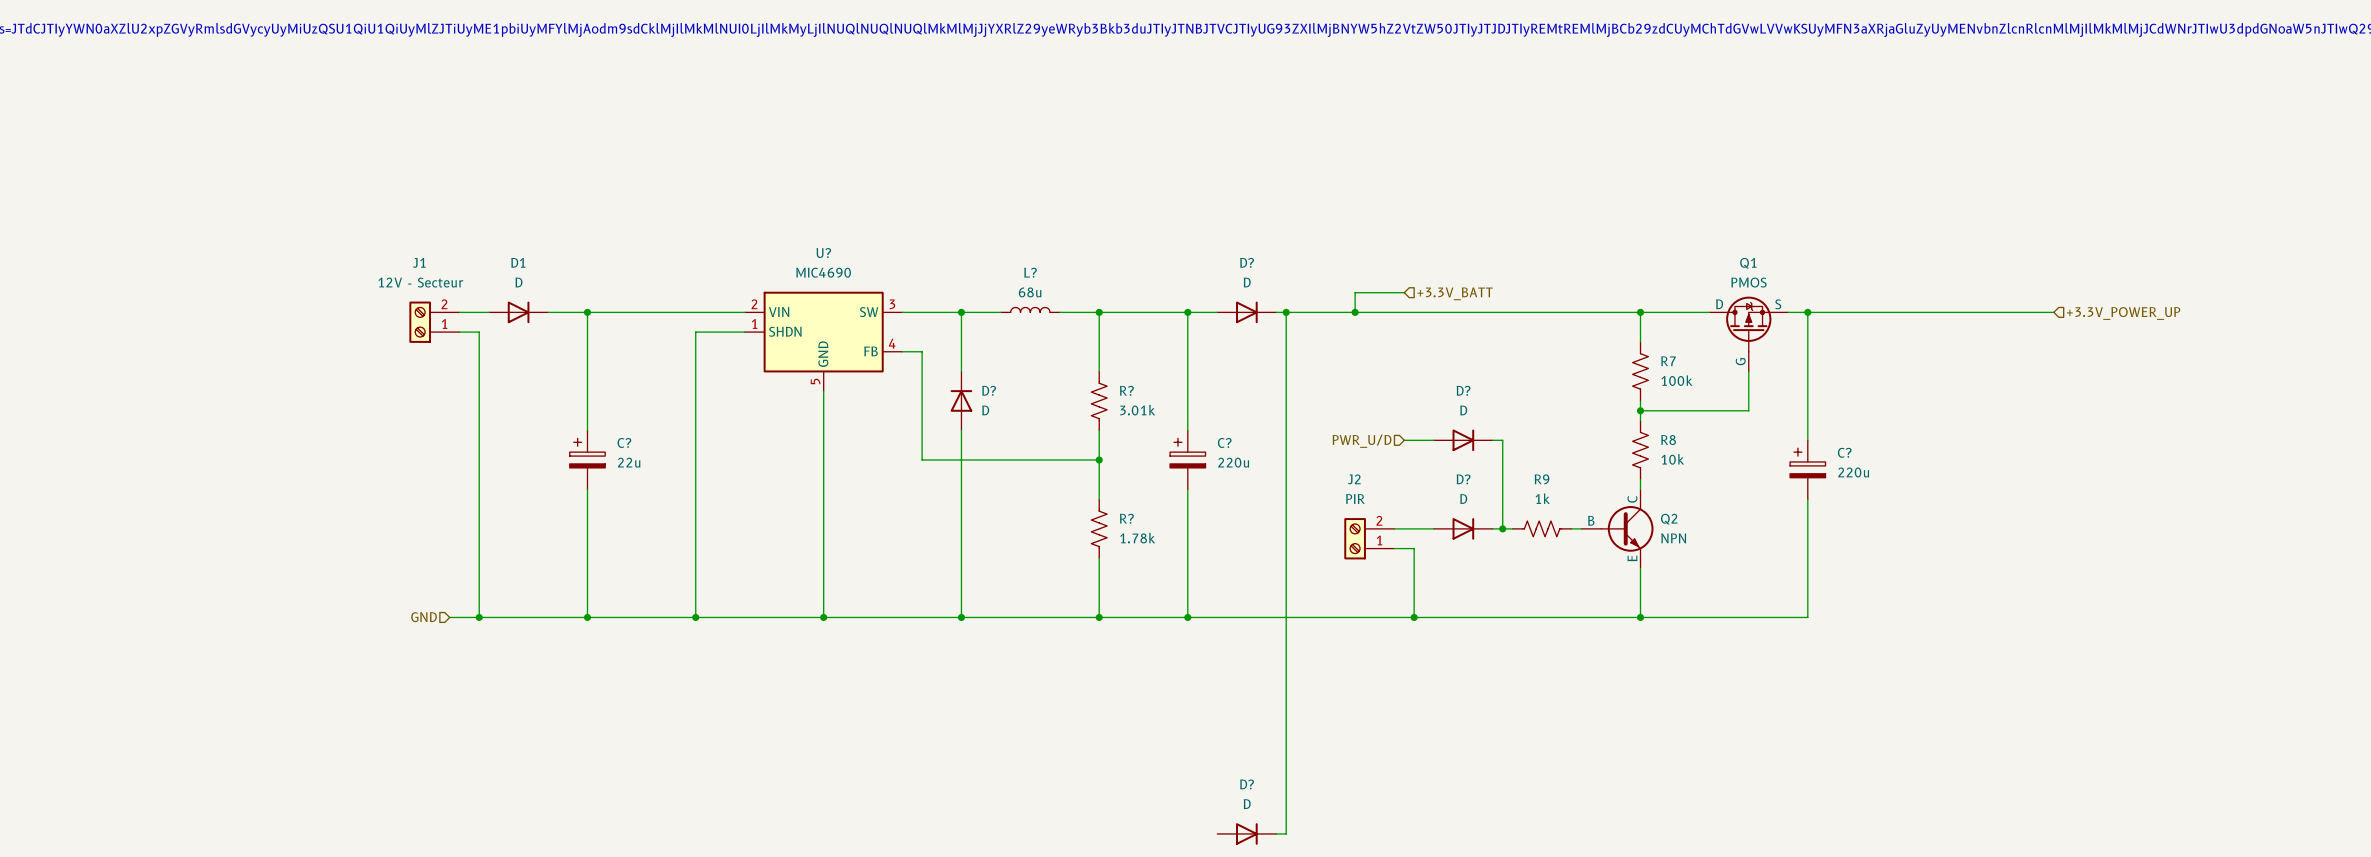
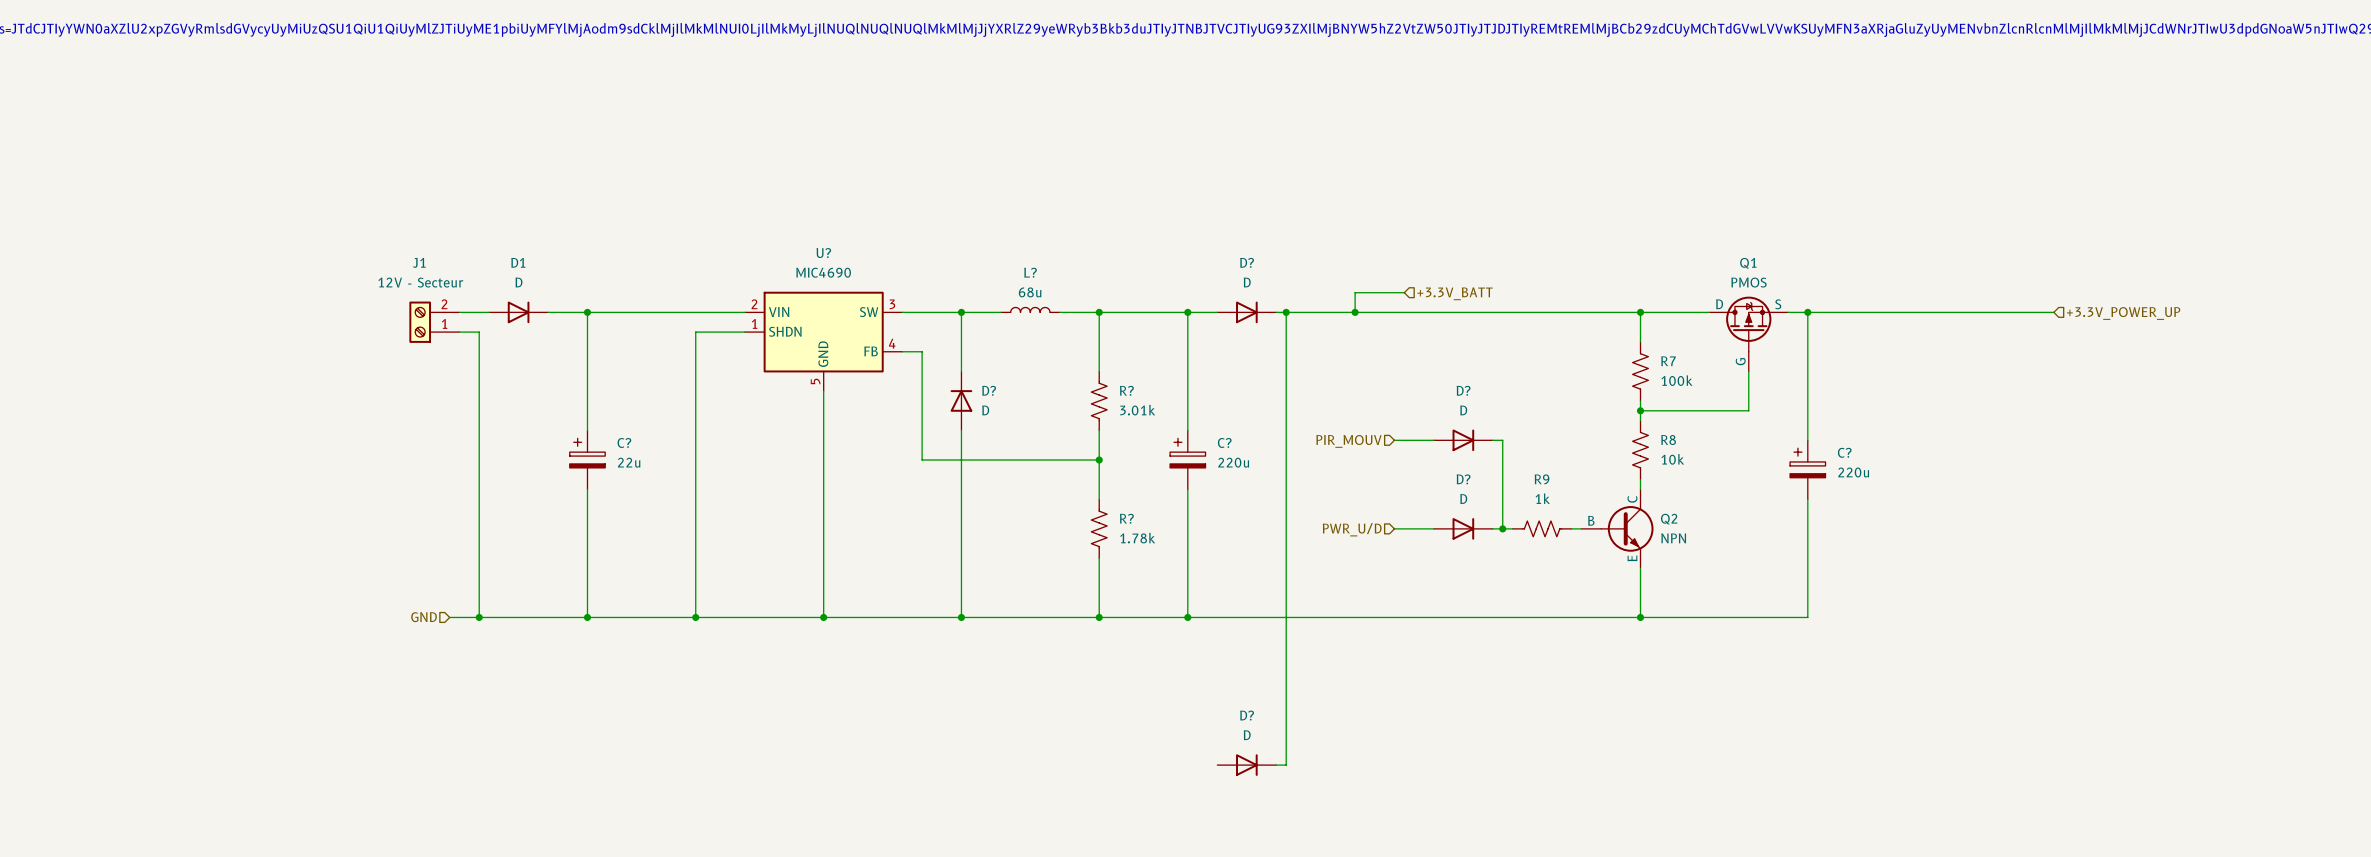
wire: none -> (1394, 440) (1404, 440)
hierarchical label: none -> PIR_MOUV (1348, 441)
hierarchical label position: PWR_U/D (1362, 441) -> PWR_U/D (1352, 529)
J2: PIR (1369, 538) -> none
wire: (1394, 548) (1414, 548) (1414, 617) -> none
junction: (1414, 617) -> none
wire: (1286, 765) (1286, 833) (1276, 833) -> (1286, 765) (1276, 765)
D? position: (1246, 833) -> (1246, 765)

